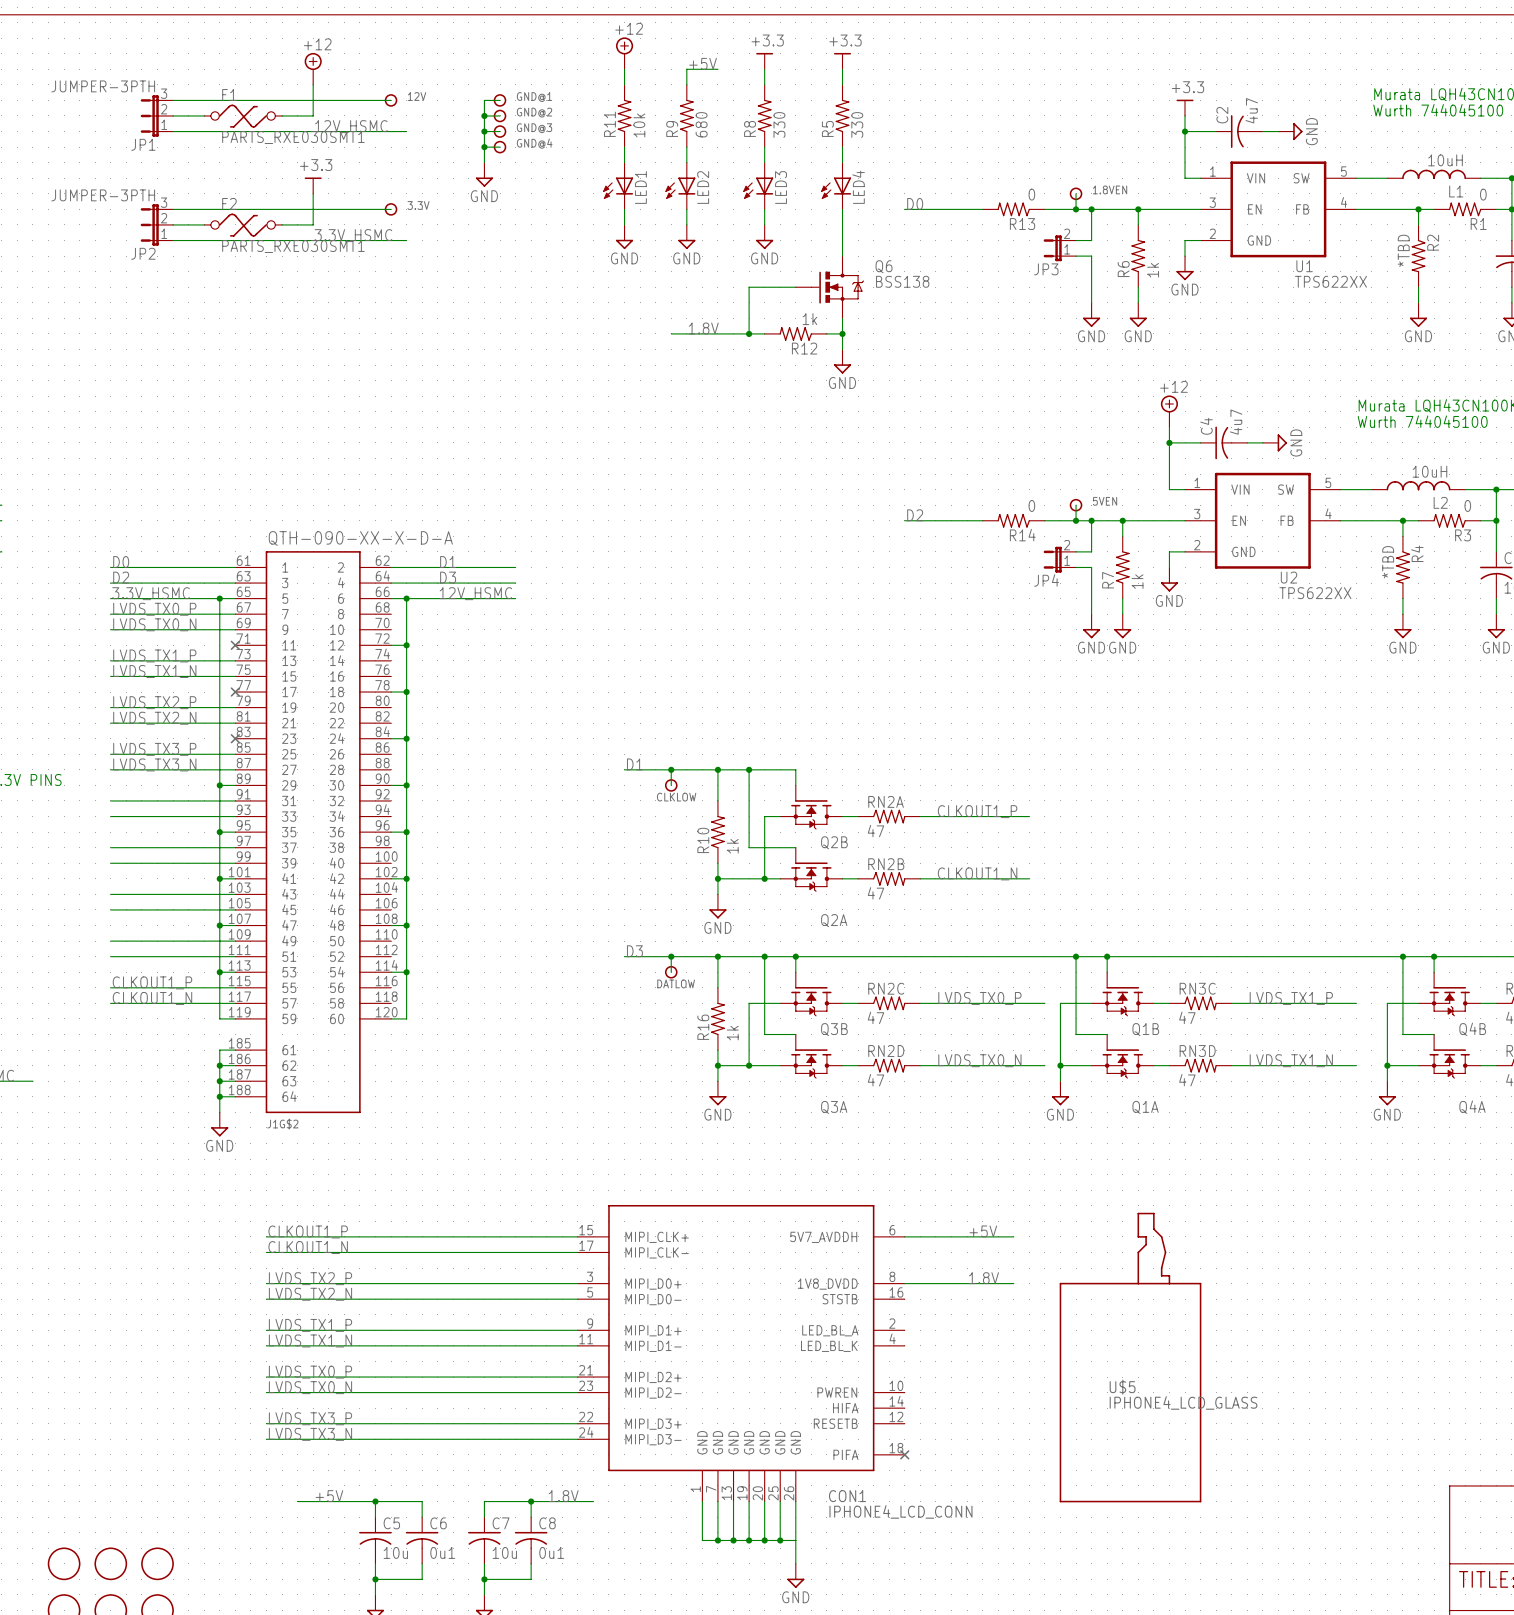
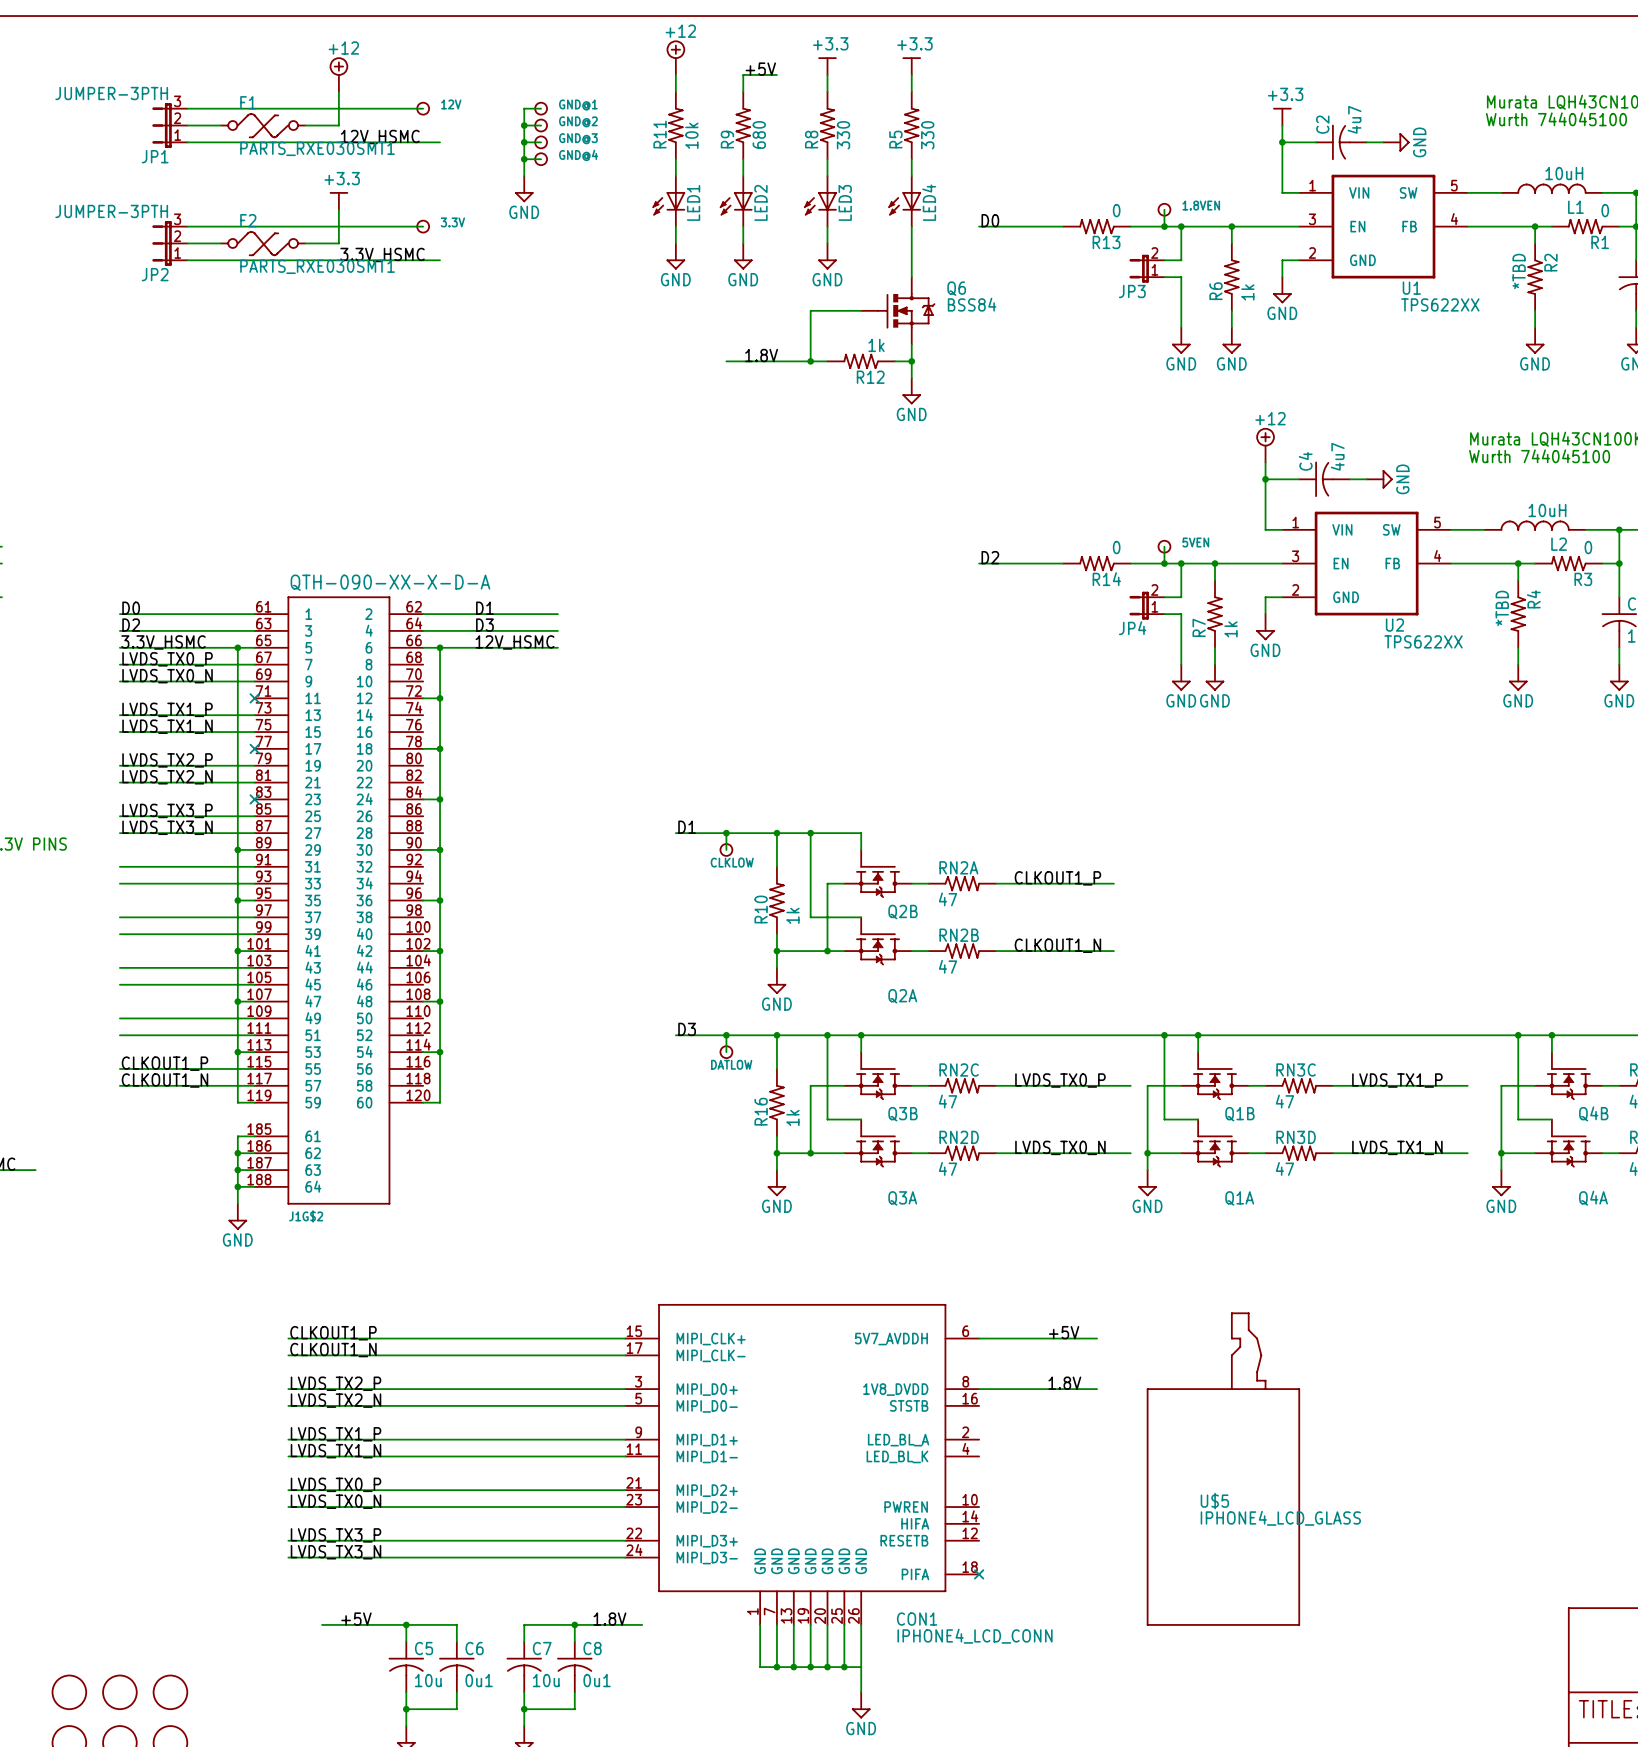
Q6 value: BSS138 (902, 281) -> BSS84 (972, 304)

